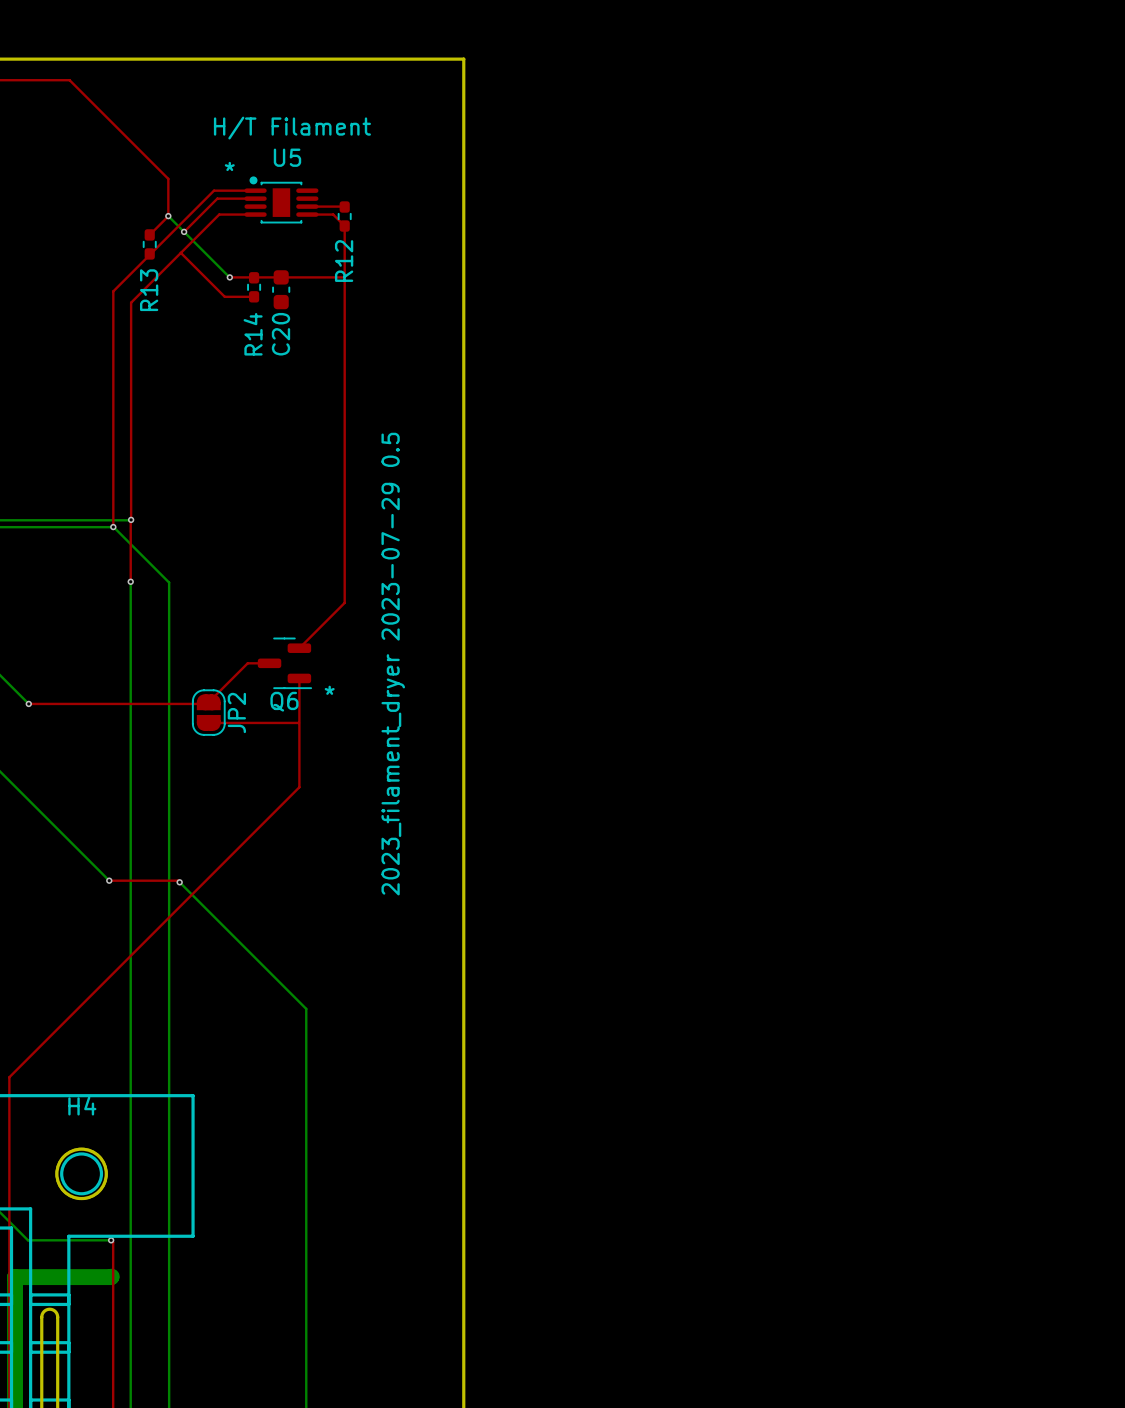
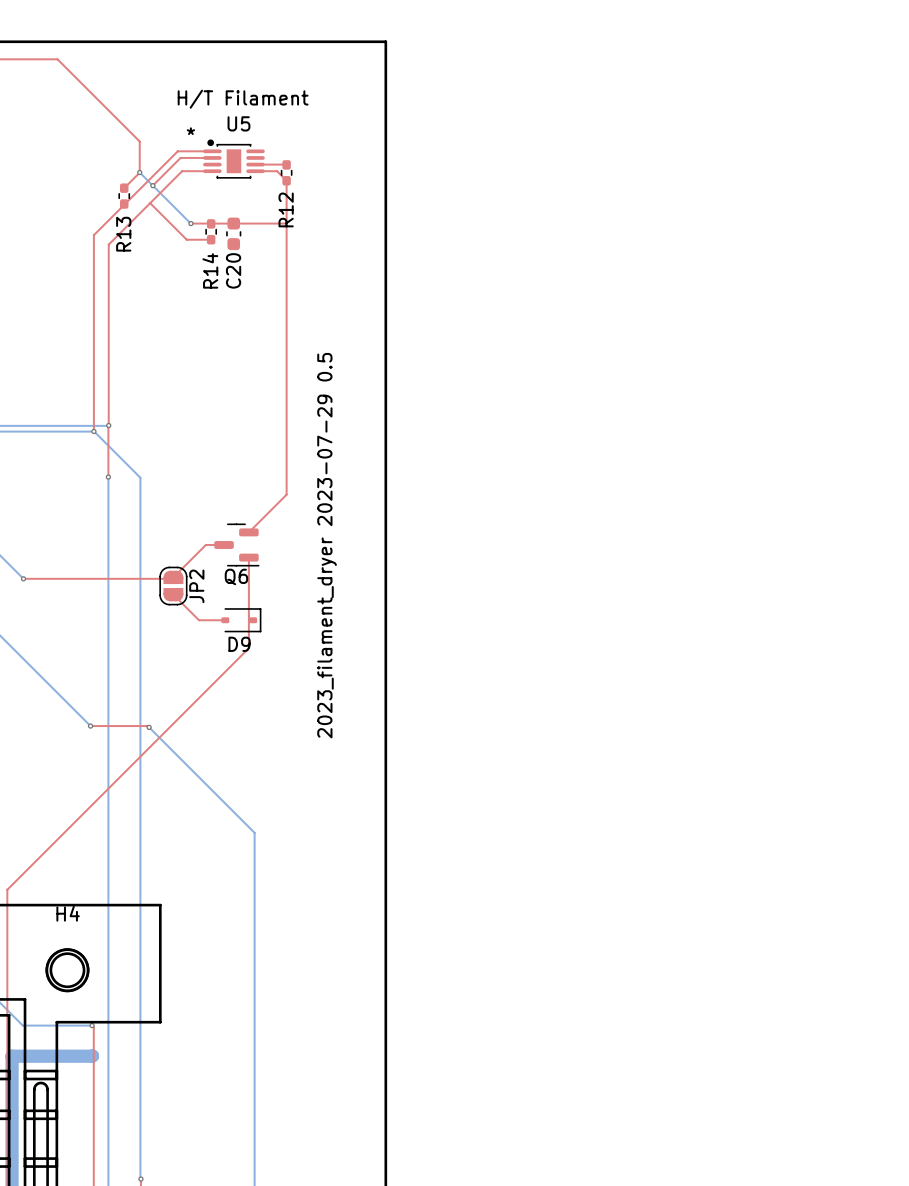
text: * (329, 690) -> none
top track: (208, 722) (298, 722) -> (173, 594) (199, 620) (225, 620)
D9: none -> (241, 620)

